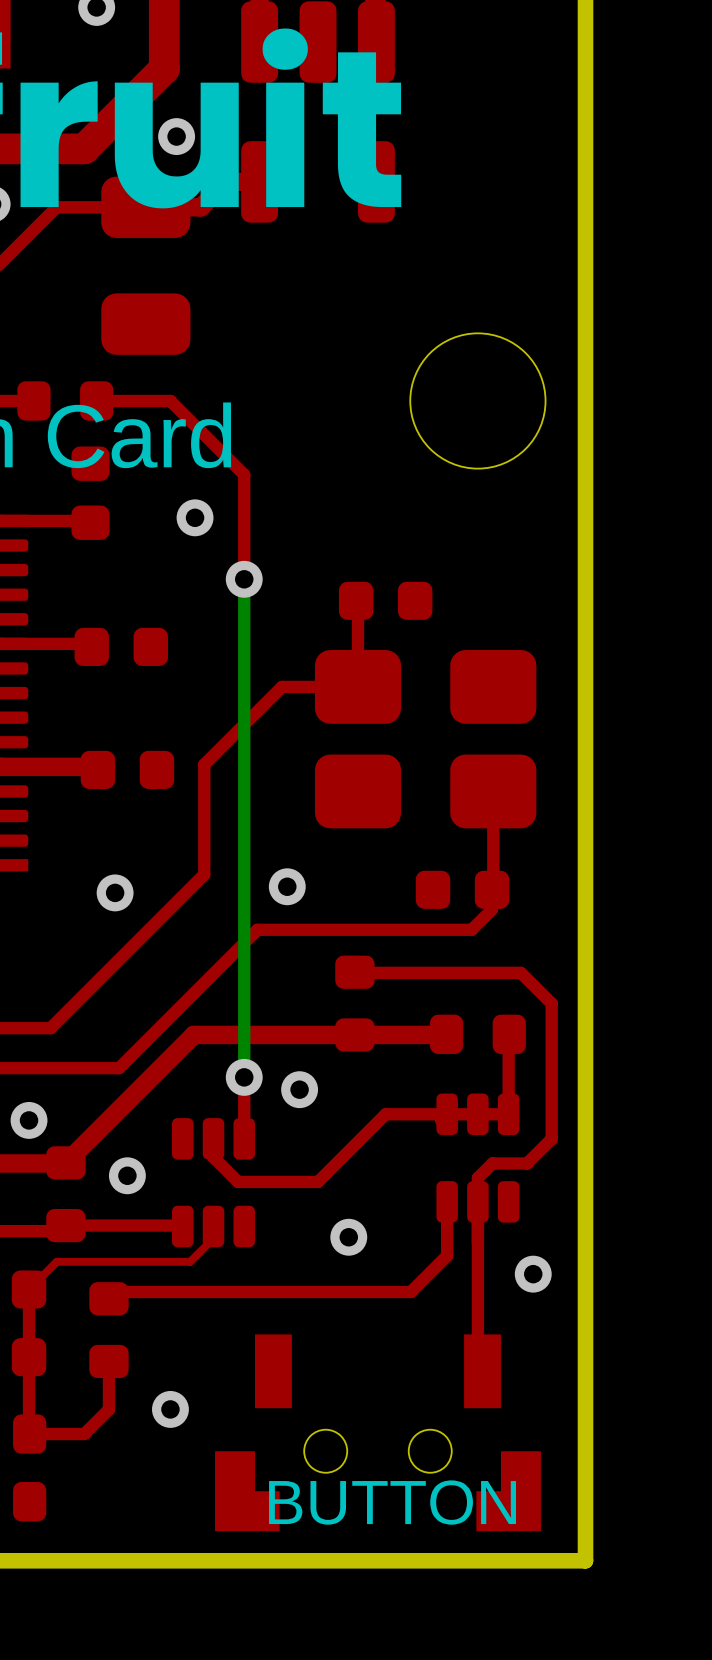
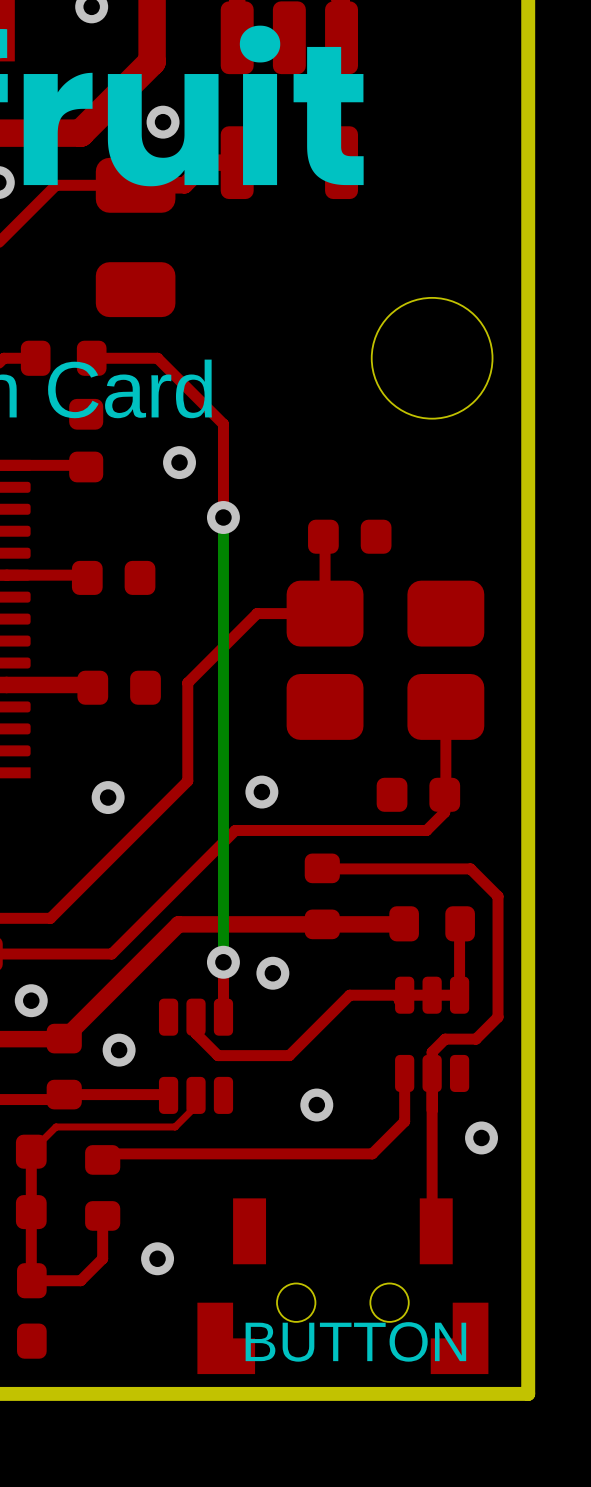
part footprint: [215, 1334, 541, 1532] -> [197, 1198, 489, 1375]

